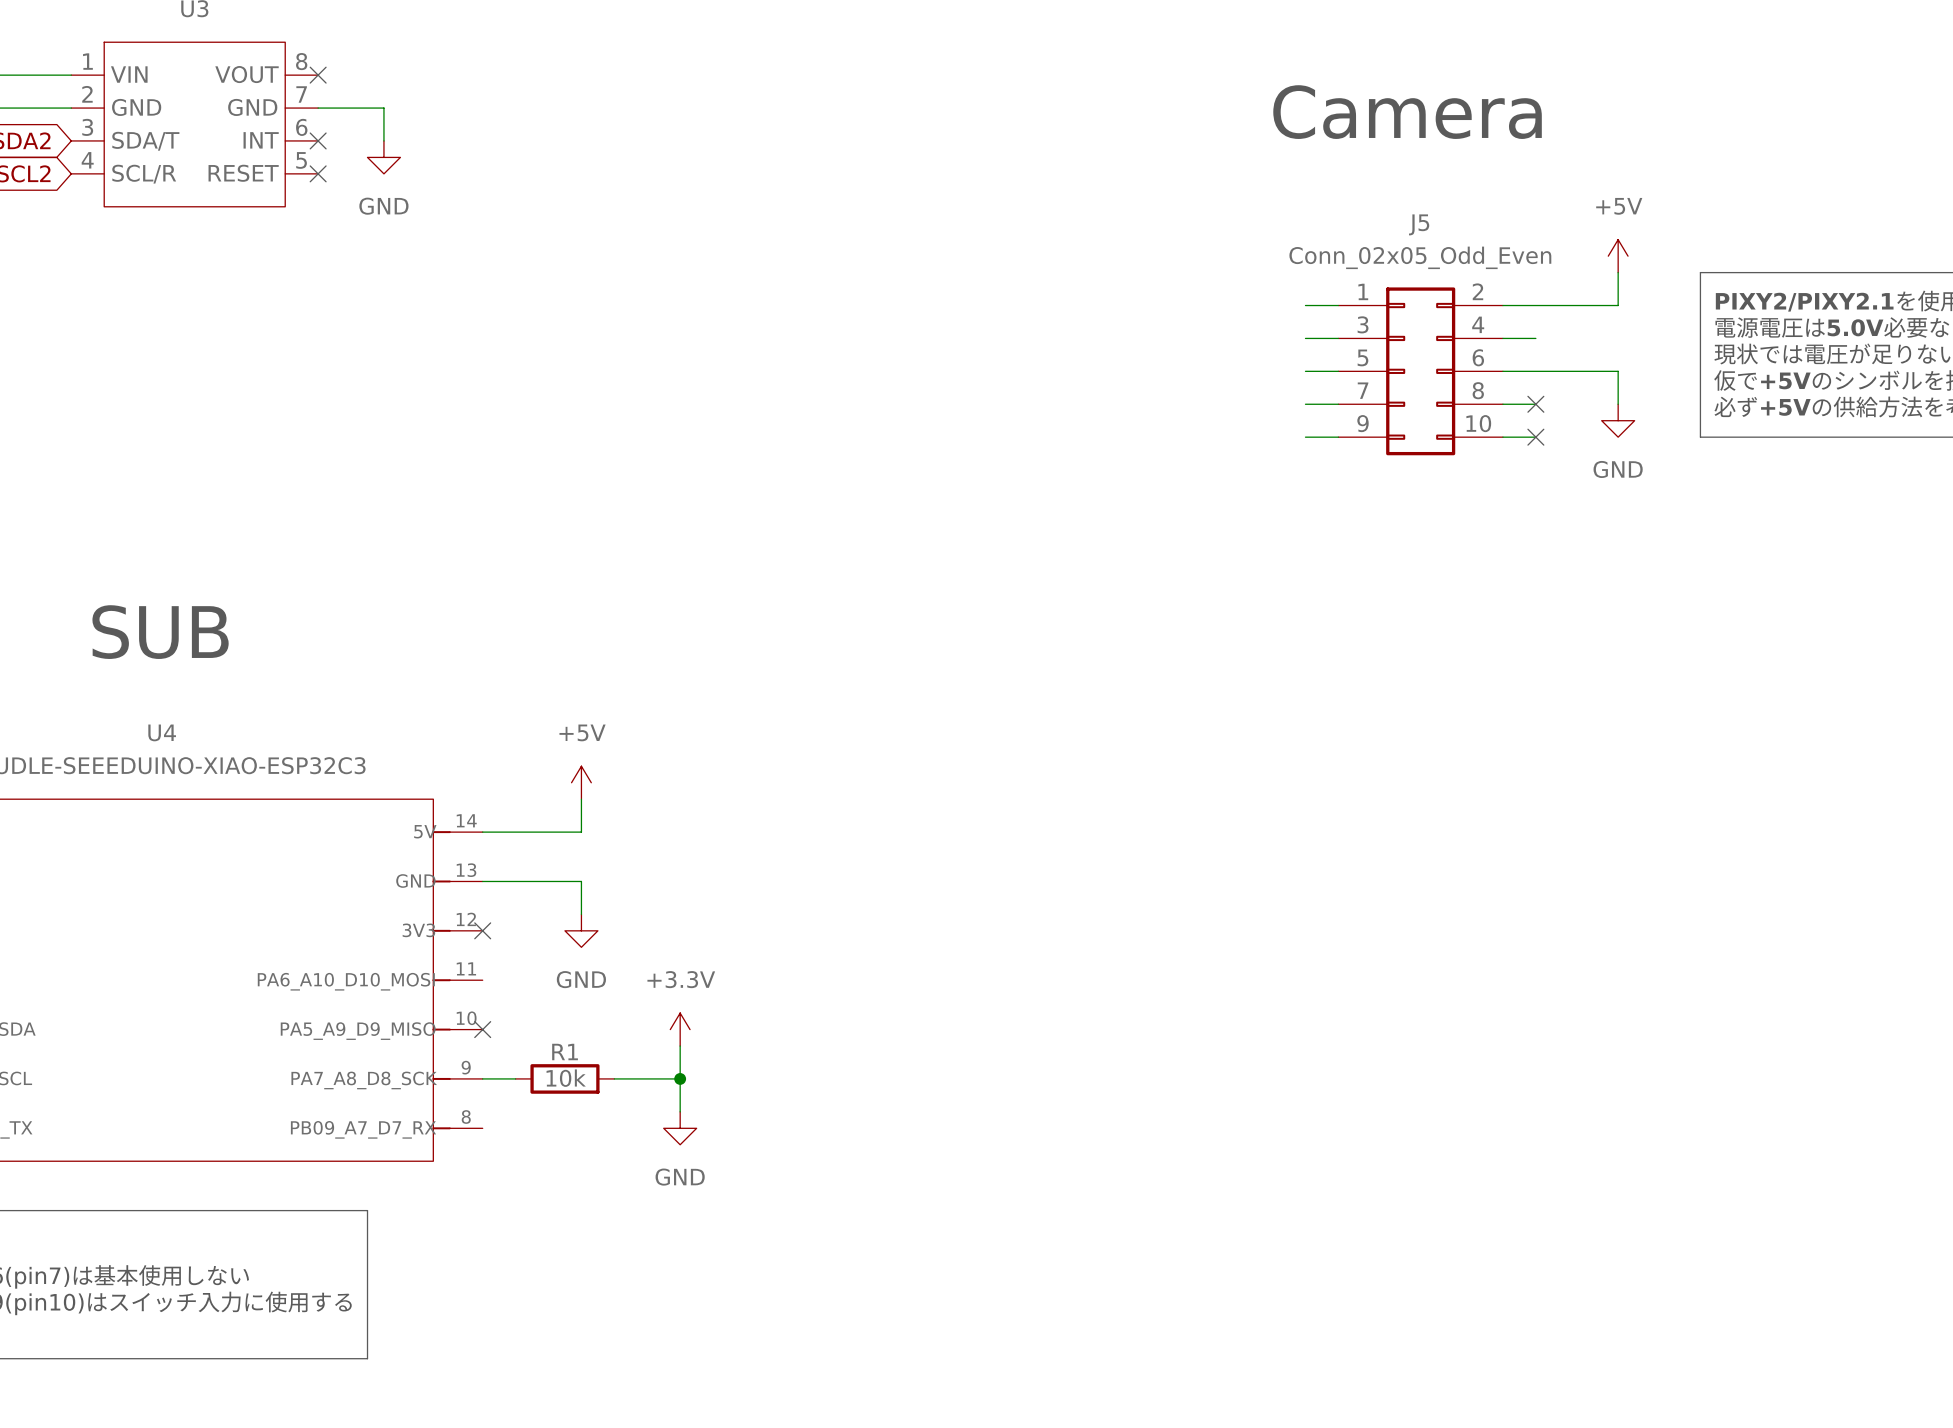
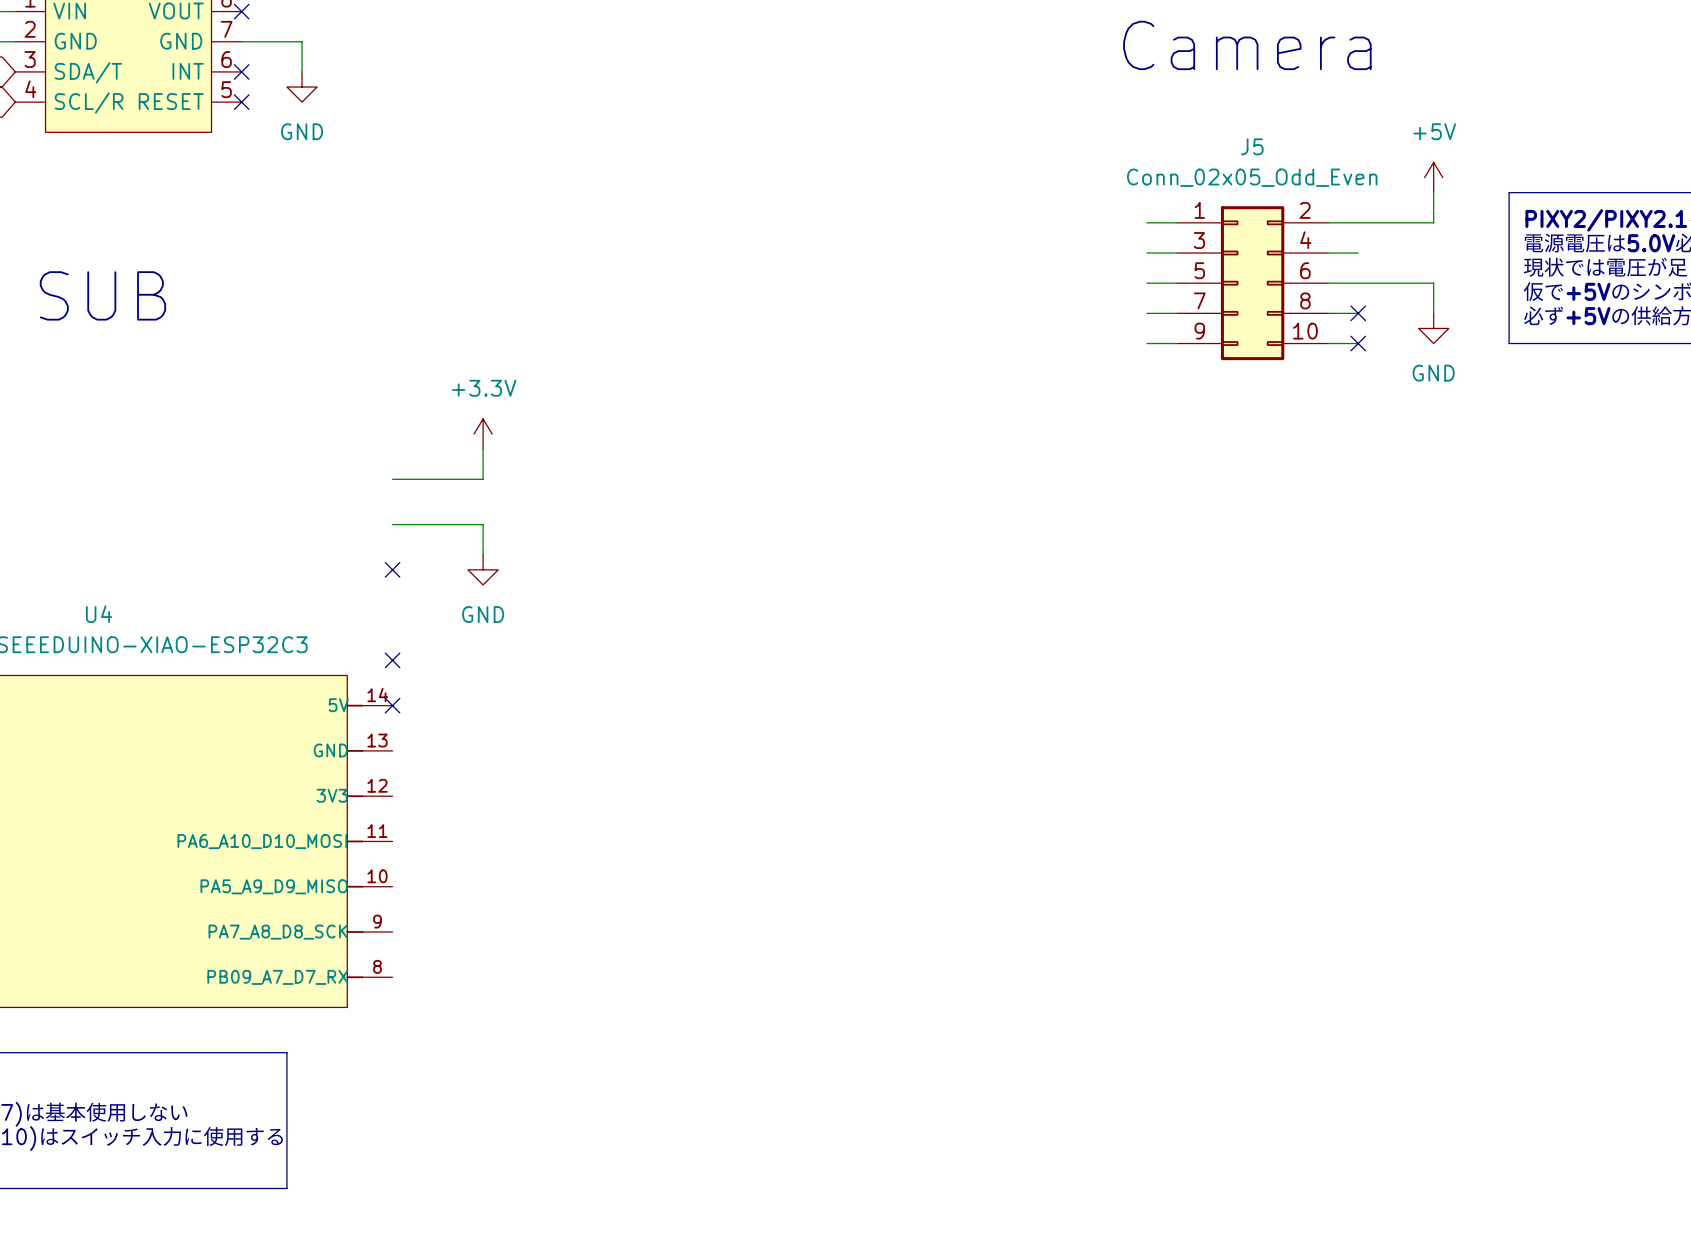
power symbol: none -> +3.3V (483, 434)
text position: SUB (160, 632) -> SUB (102, 295)
no-connect mark: none -> (392, 569)
power symbol: none -> GND (483, 569)
no-connect mark: none -> (392, 660)
power symbol: +5V (581, 782) -> none
wire: (581, 799) (581, 832) (482, 832) -> (483, 449) (483, 479) (392, 479)
no-connect mark: none -> (392, 705)
wire: (482, 881) (581, 881) (581, 914) -> (392, 524) (483, 524) (483, 554)
no-connect mark: (482, 930) -> none
power symbol: GND (581, 930) -> none
no-connect mark: (482, 1029) -> none
power symbol: +3.3V (680, 1029) -> none
wire: (680, 1046) (680, 1111) -> none
wire: (482, 1078) (515, 1078) -> none
R1: 10k (564, 1078) -> none
wire: (614, 1078) (680, 1078) -> none
junction: (680, 1078) -> none
power symbol: GND (680, 1128) -> none

